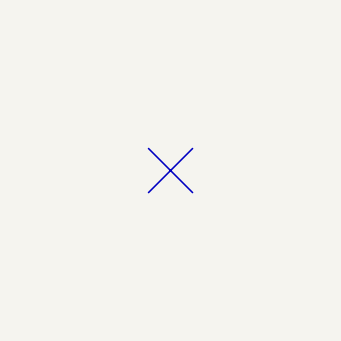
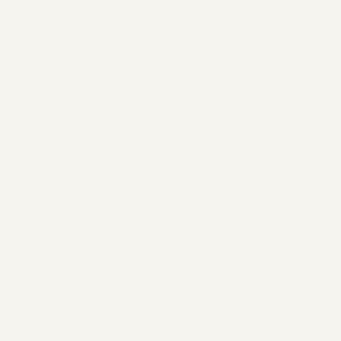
no-connect mark: (170, 170) -> none

